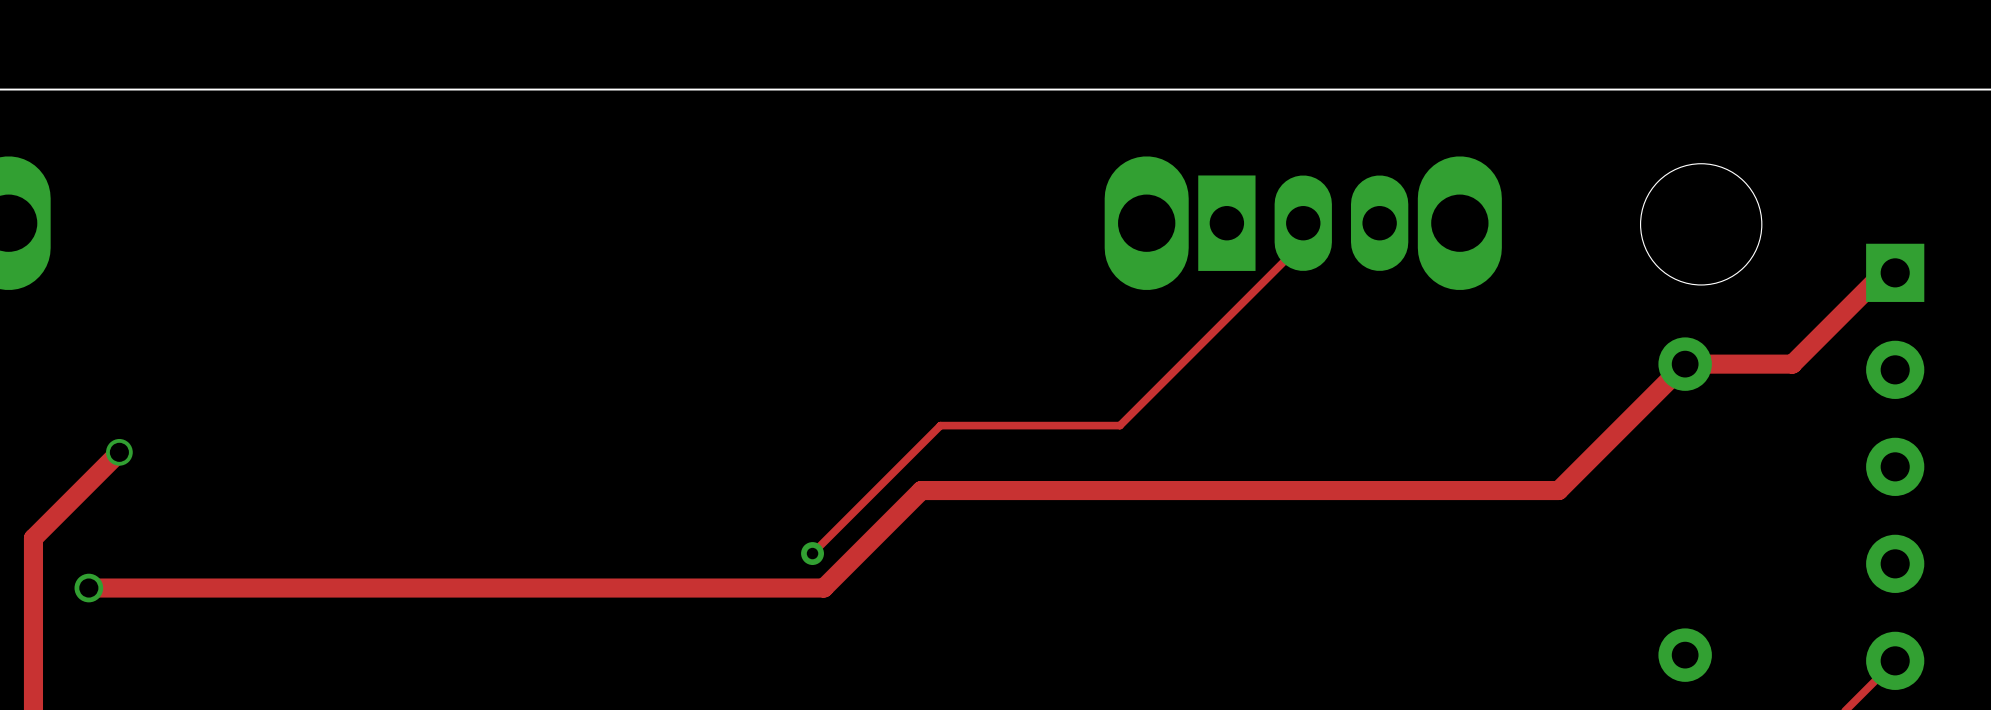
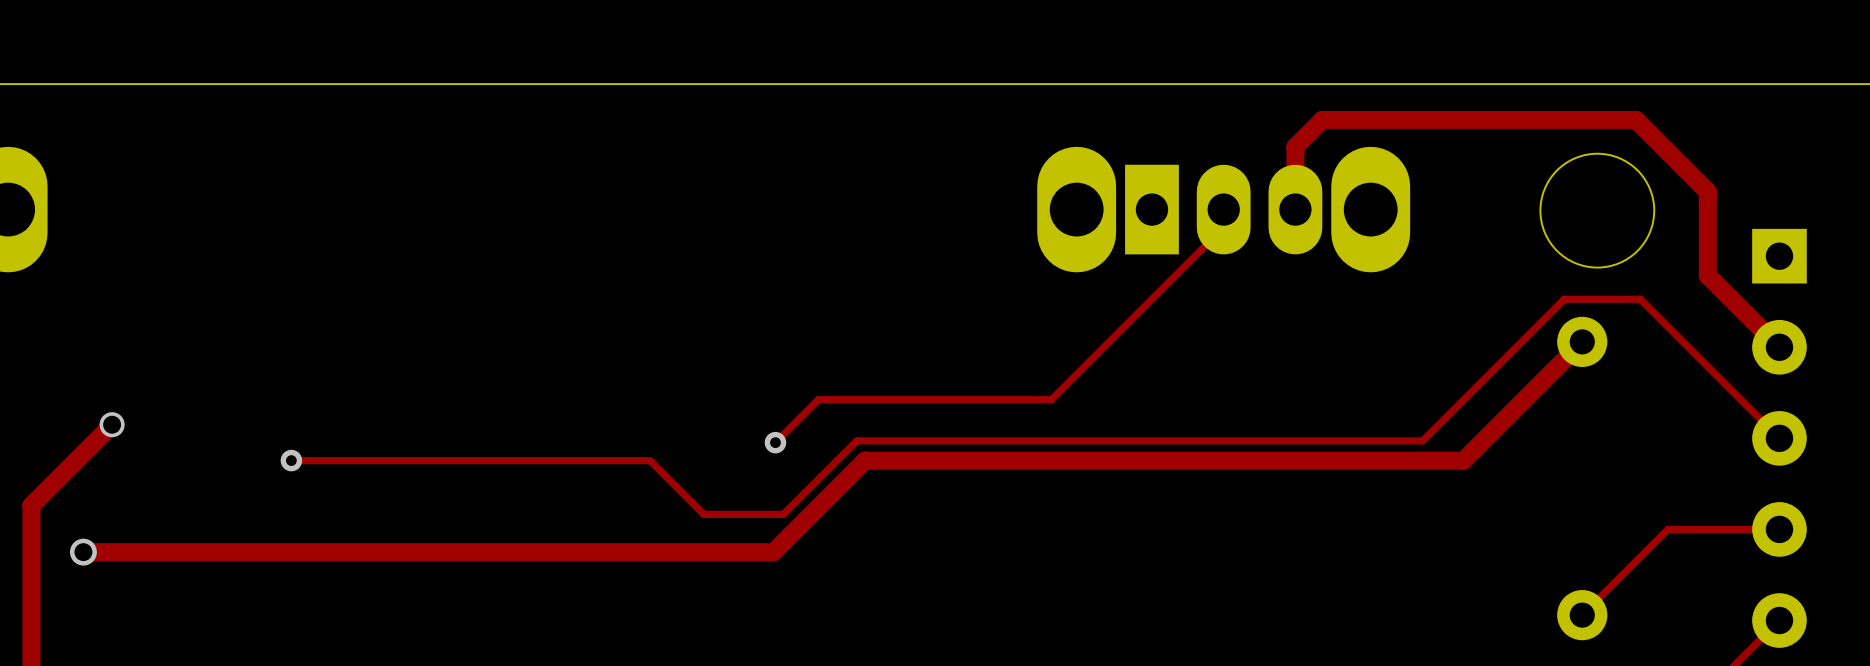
track: none -> (1295, 209) (1295, 146) (1322, 119) (1636, 119) (1707, 191) (1707, 275) (1779, 347) (1779, 353)
track: (1883, 272) (1792, 364) (1685, 364) -> none
track: (940, 425) (812, 553) -> (883, 399) (818, 399) (775, 442)
track: none -> (1779, 438) (1640, 299) (1564, 299) (1422, 440) (856, 440) (783, 514) (703, 514) (649, 460) (291, 460)
via: none -> (291, 460)
via position: (812, 553) -> (775, 442)
track: none -> (1779, 529) (1667, 529) (1582, 615)

